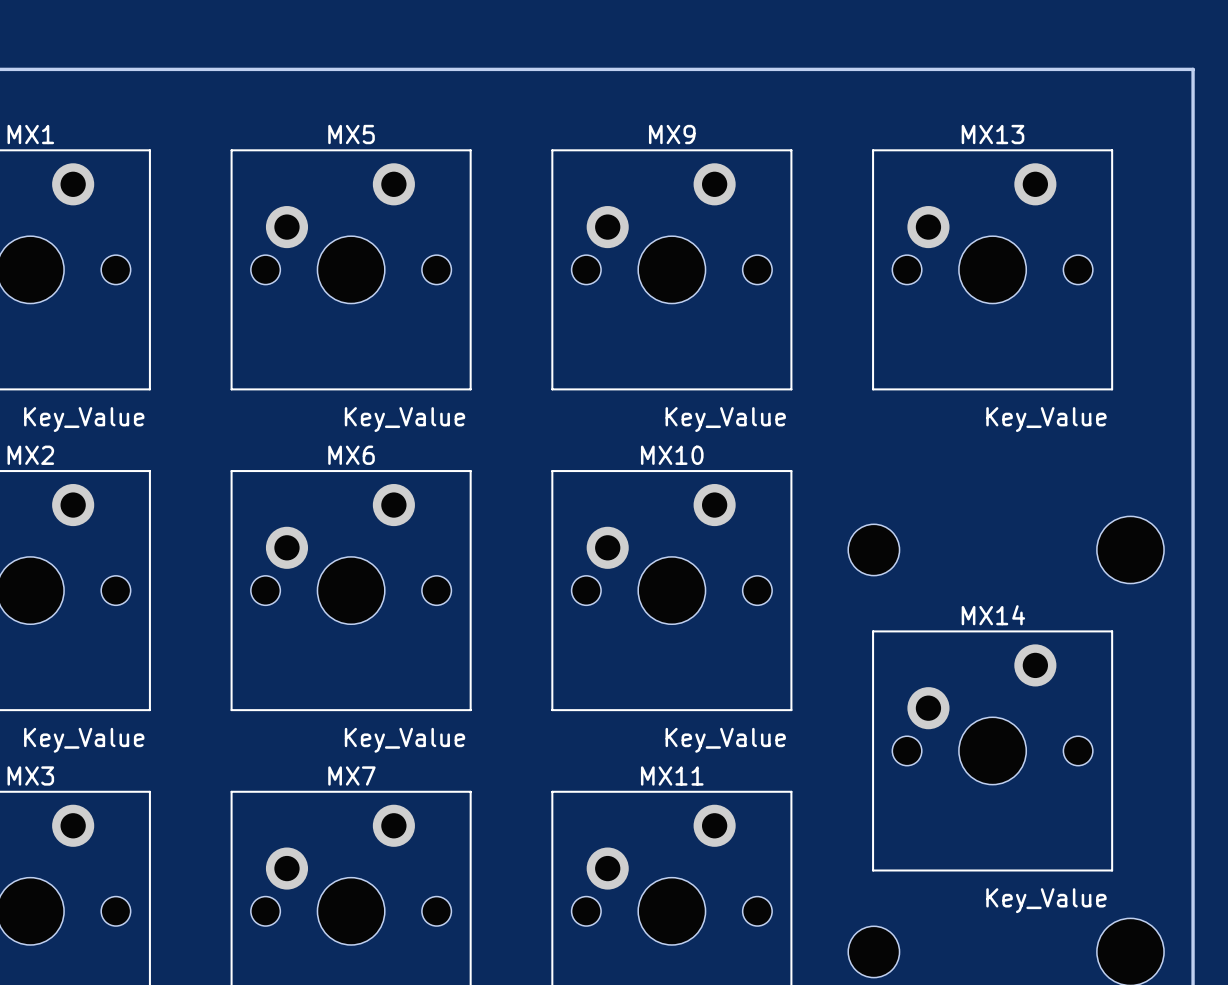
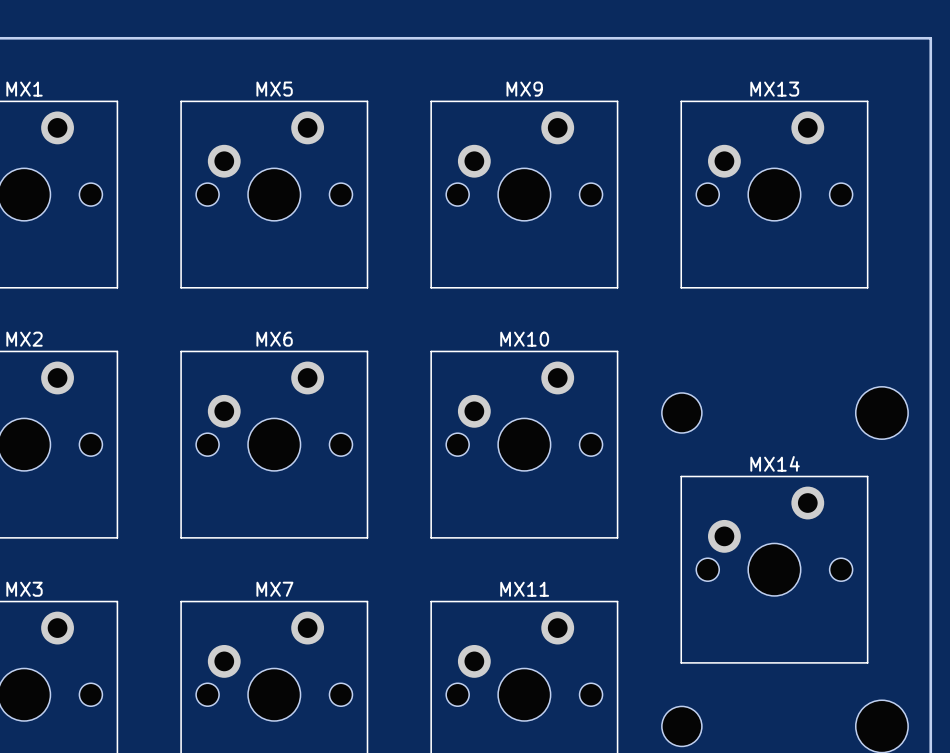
part: (84, 419) -> none
part: (404, 419) -> none
part: (725, 419) -> none
part: (1046, 419) -> none
part: (84, 740) -> none
part: (404, 740) -> none
part: (725, 740) -> none
part: (1046, 900) -> none

